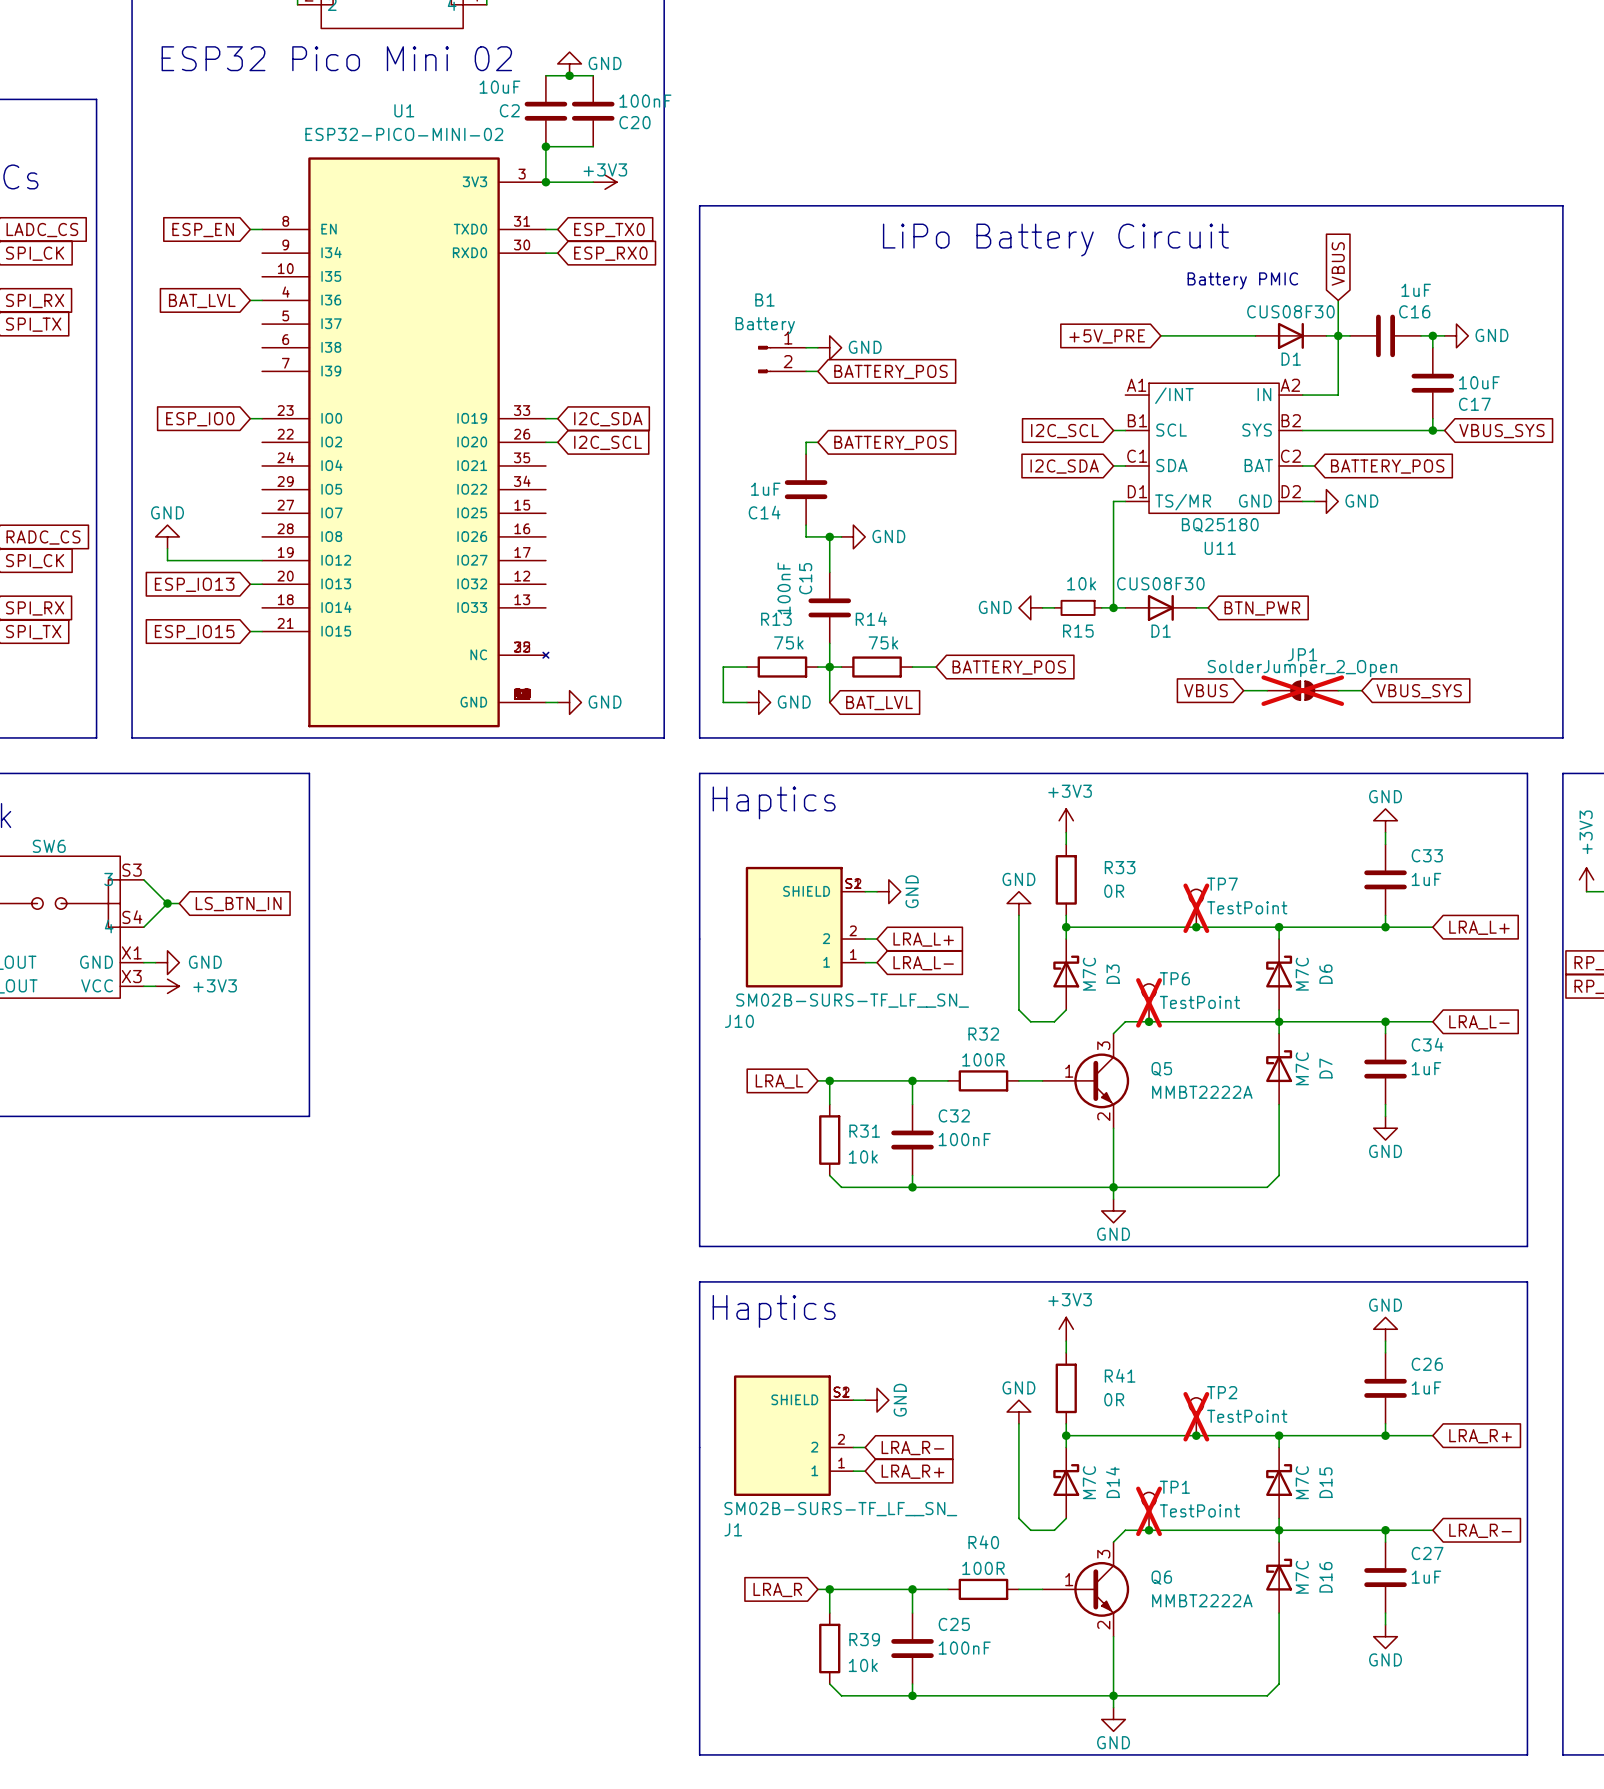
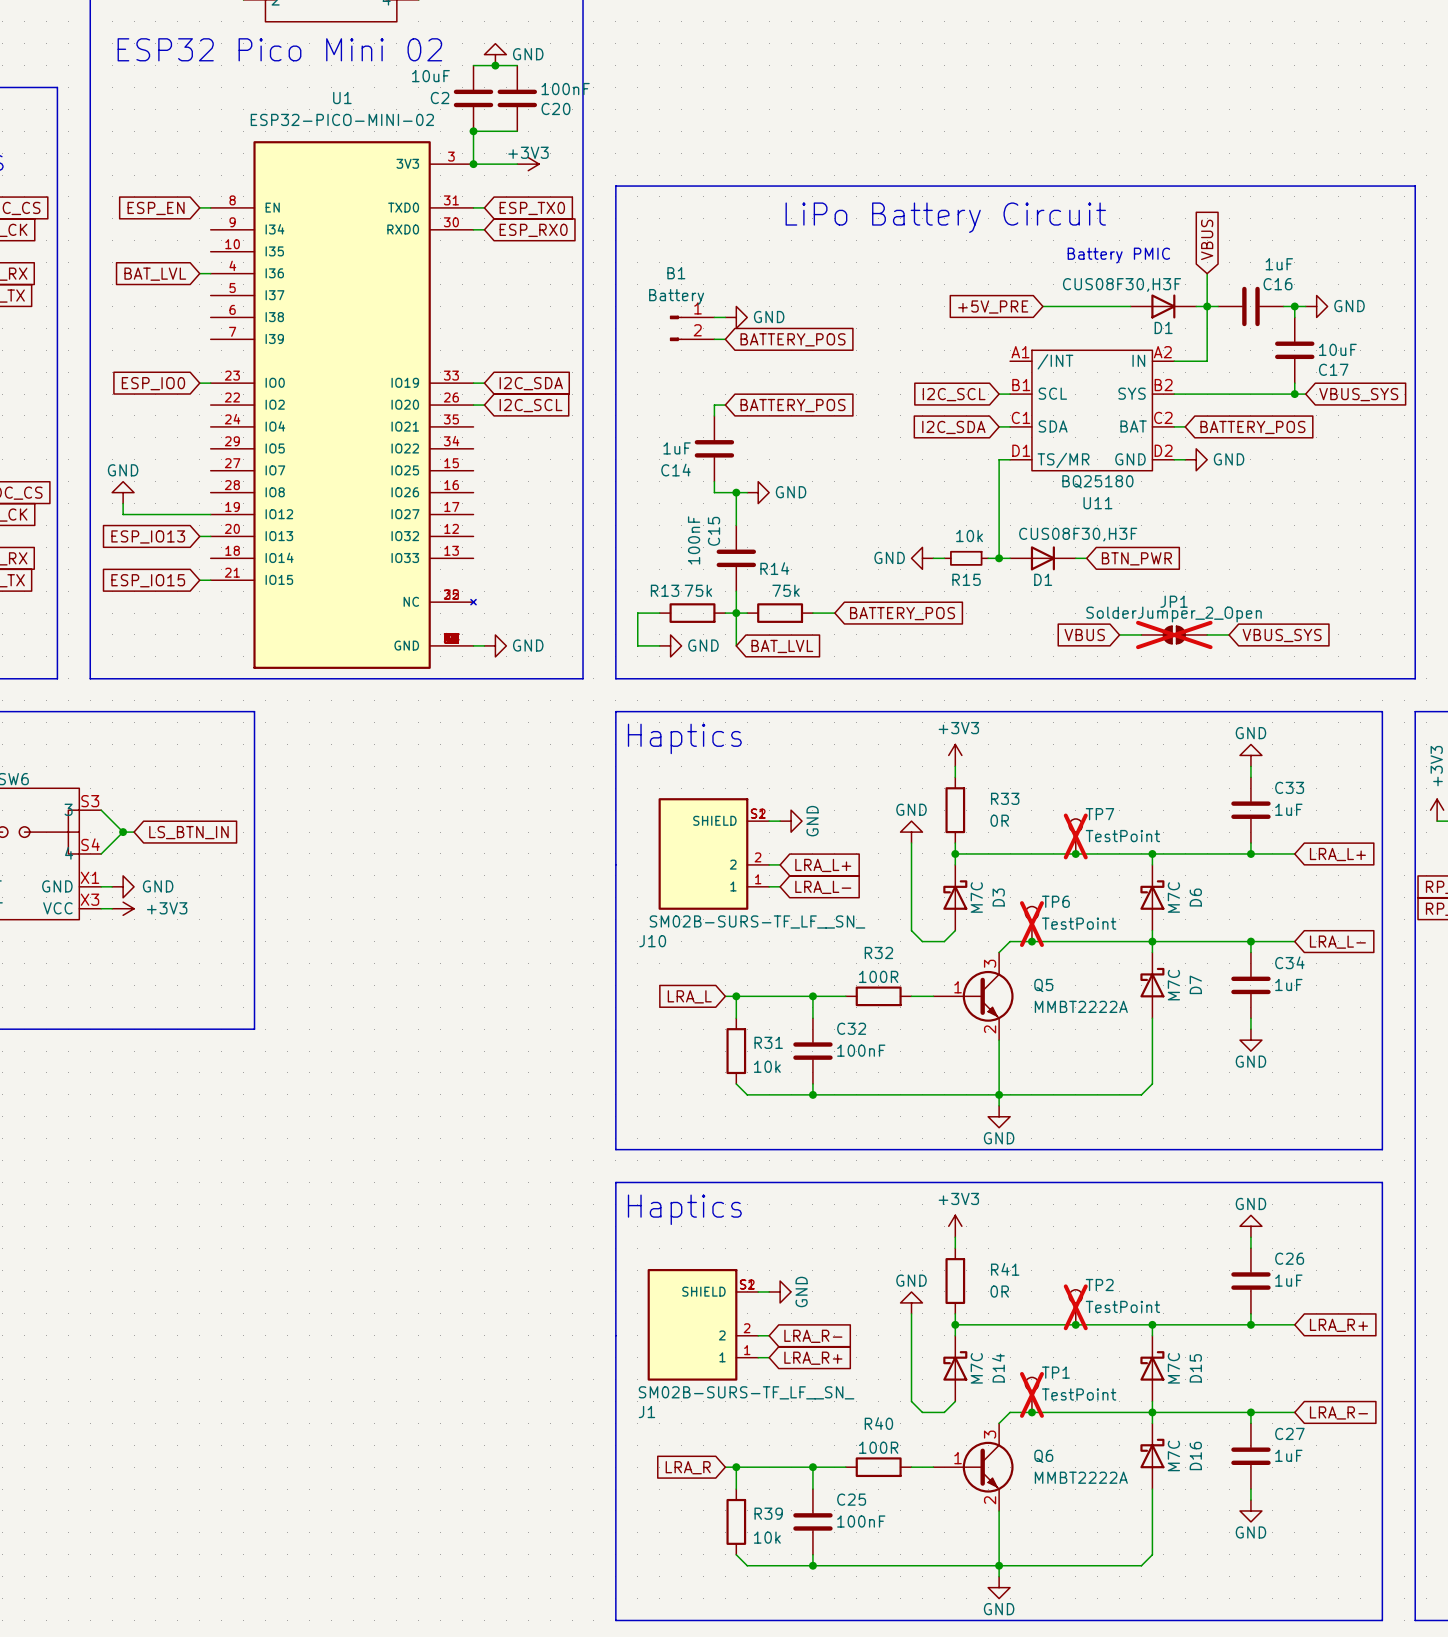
D1 value: CUS08F30 (1290, 311) -> CUS08F30,H3F (1122, 284)
D1 value: CUS08F30 (1160, 583) -> CUS08F30,H3F (1078, 534)
R13 name position: R13 (776, 619) -> R13 (665, 590)

